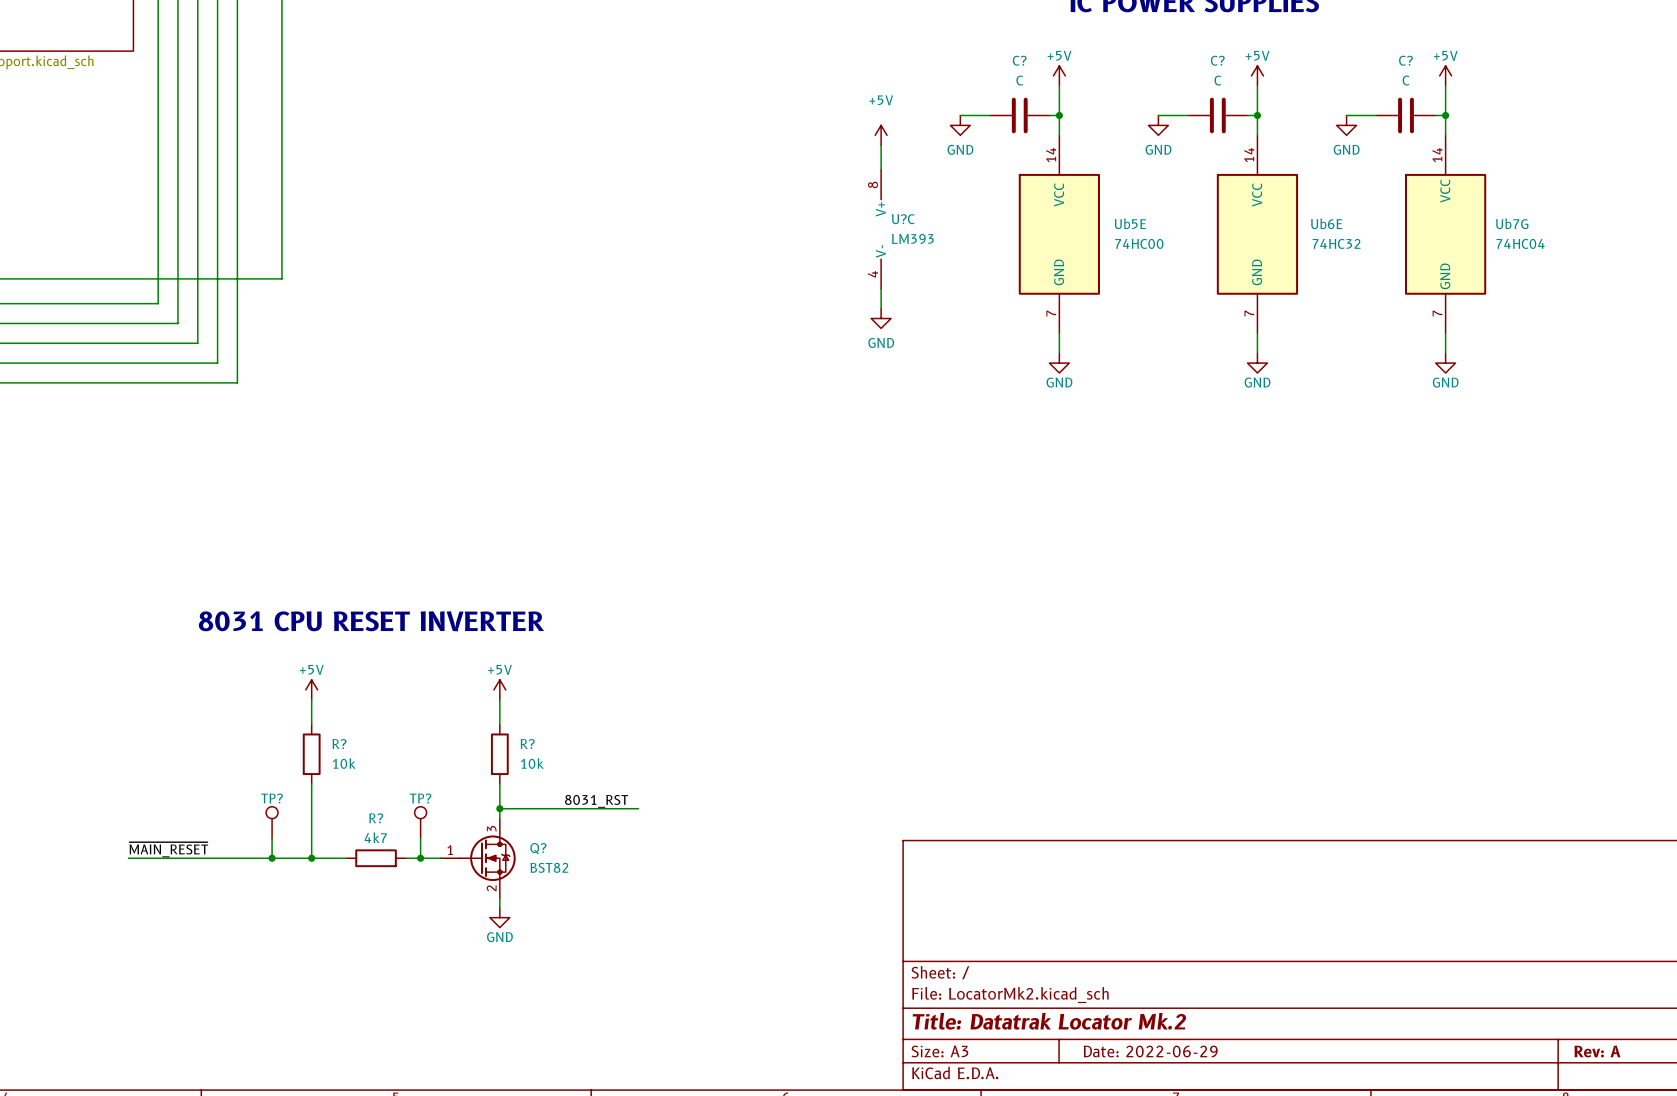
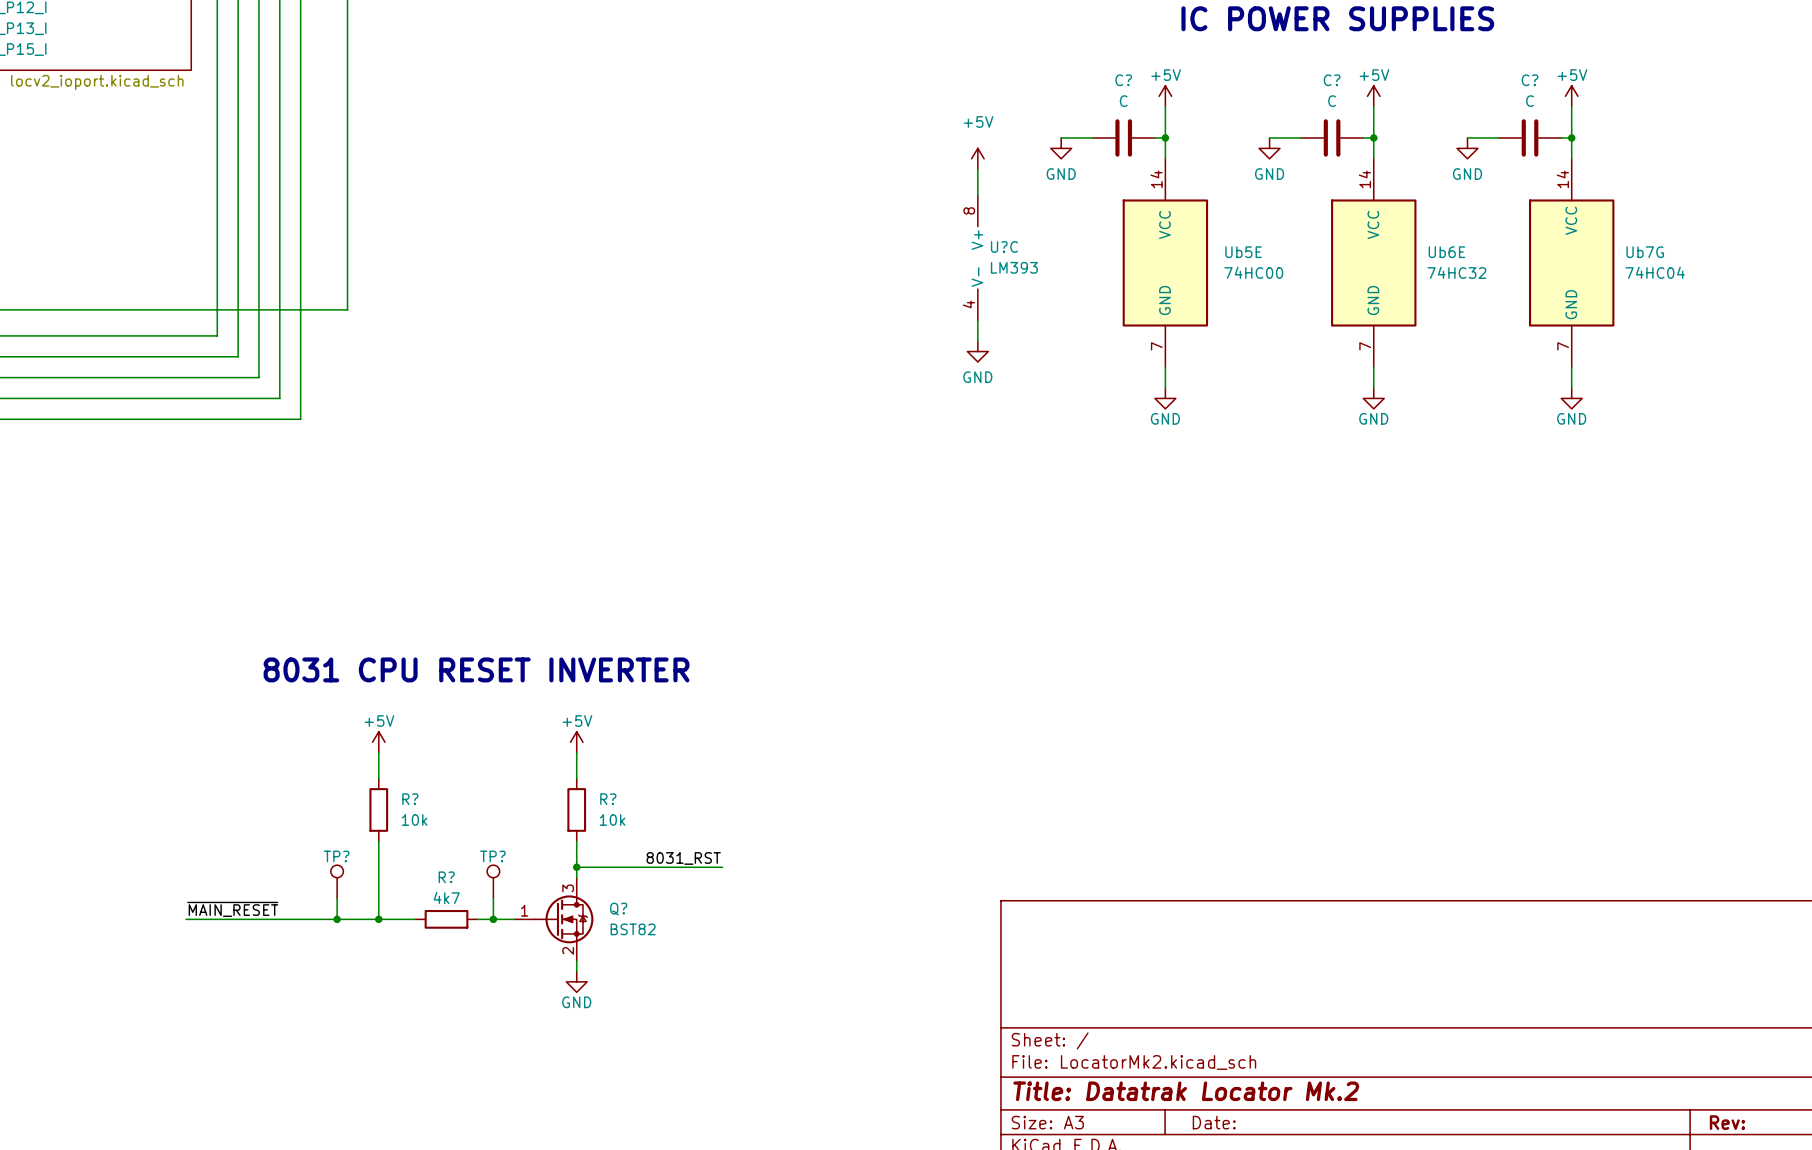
title block: Date: 2022-06-29 (1150, 1051) -> Date: (1214, 1122)
title block: Rev: A (1597, 1051) -> Rev: (1727, 1122)

